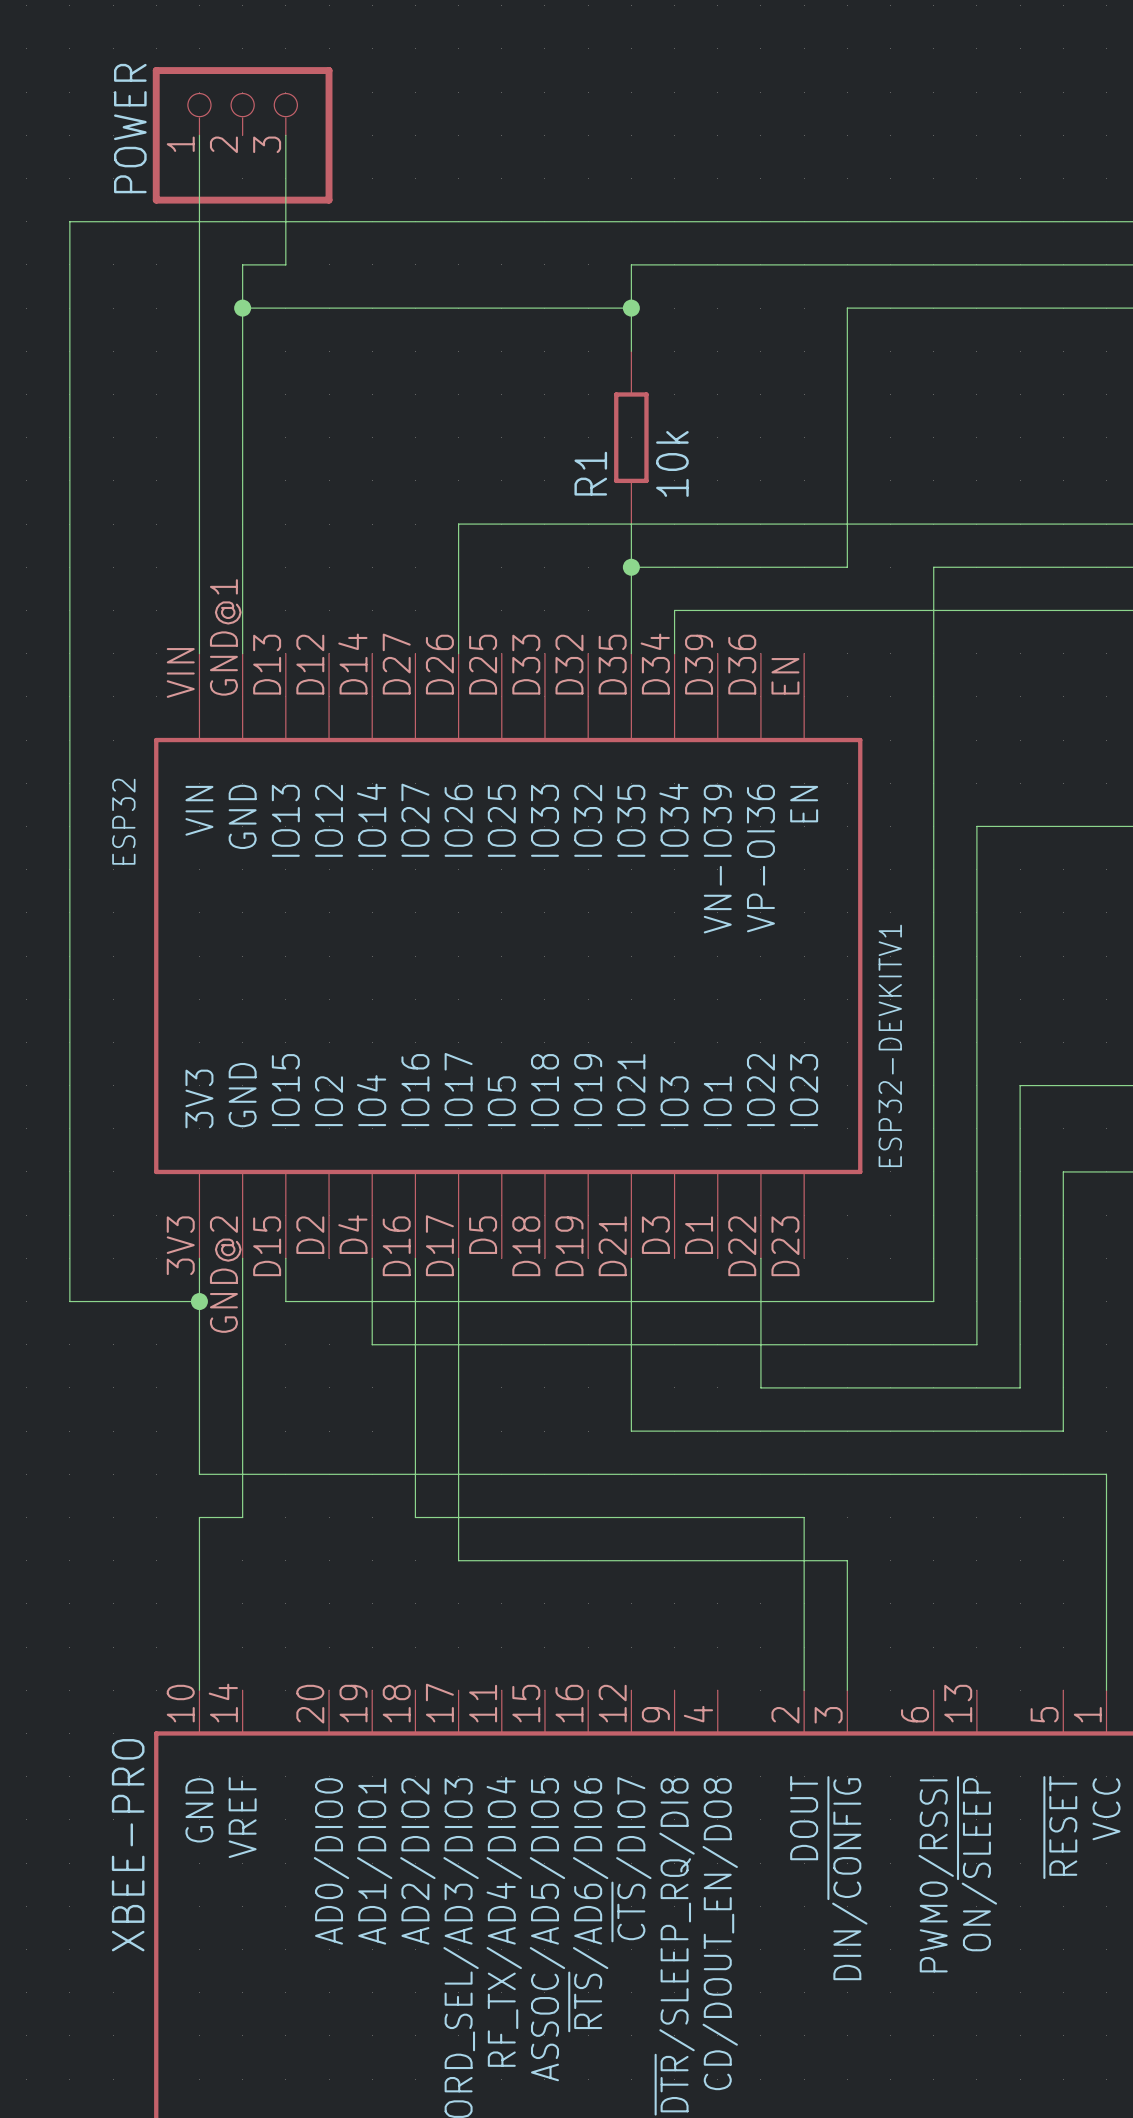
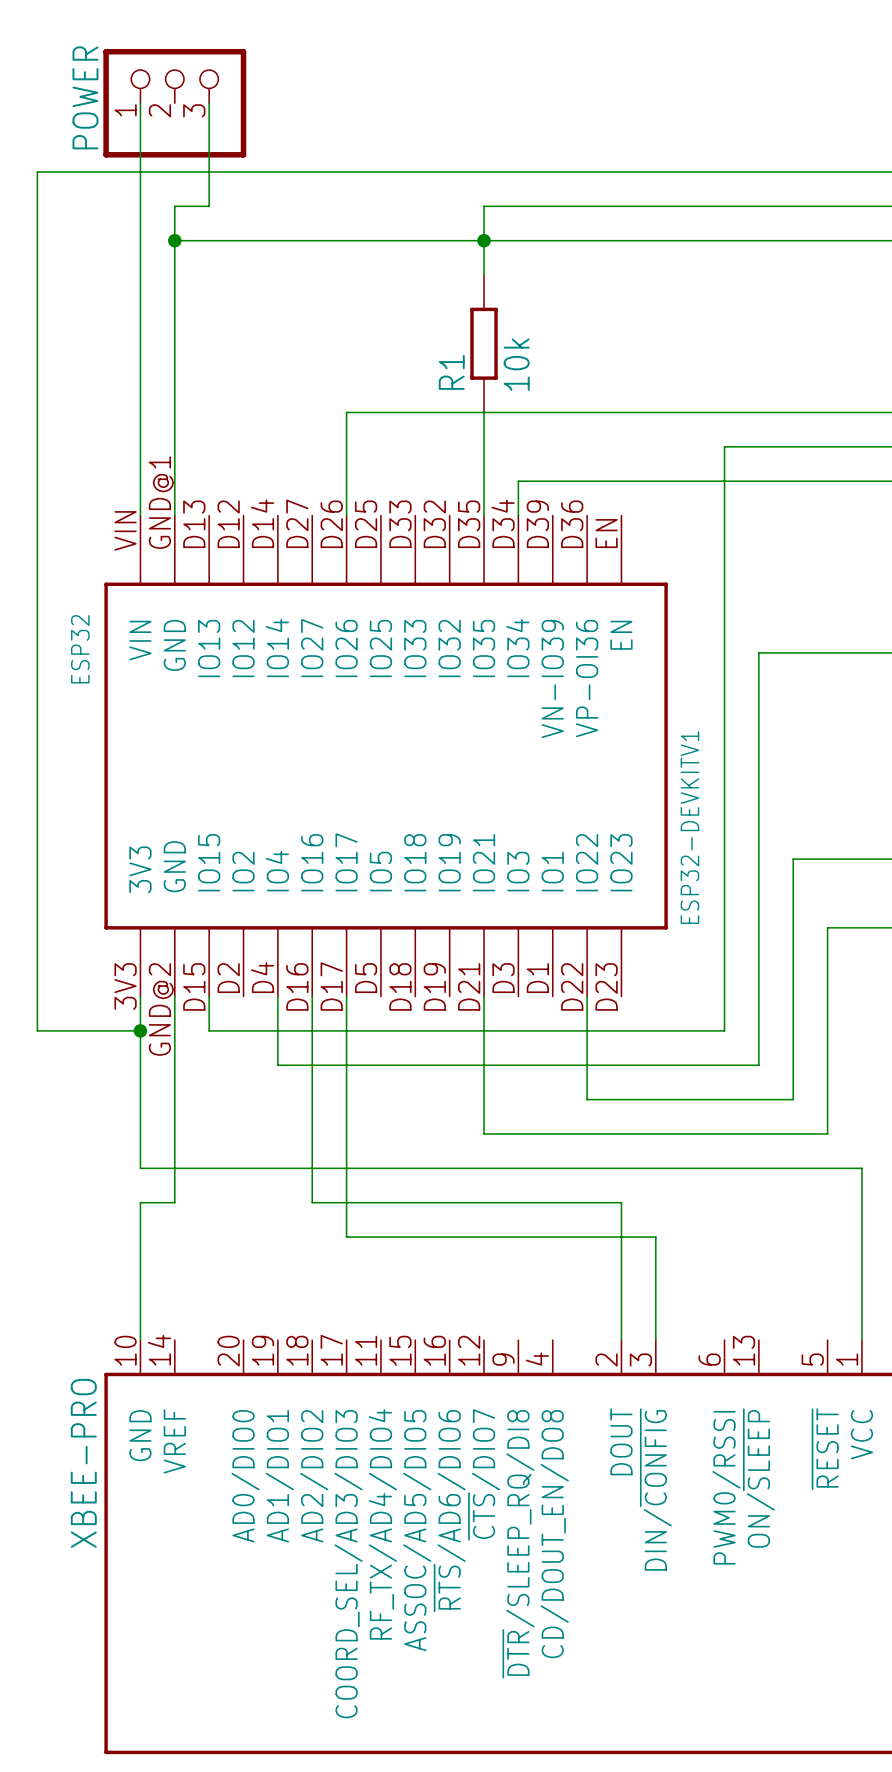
wire: (847, 308) (847, 567) (631, 567) -> (655, 240) (484, 240)
junction: (631, 567) -> none

